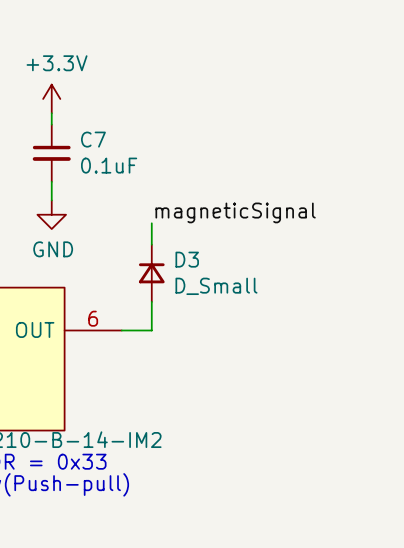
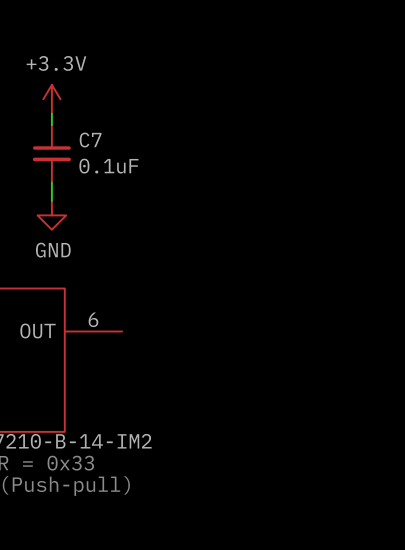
label: magneticSignal (235, 212) -> none
wire: (151, 223) (151, 244) -> none
D3: D_Small (151, 273) -> none
wire: (151, 301) (151, 330) (121, 330) -> none

